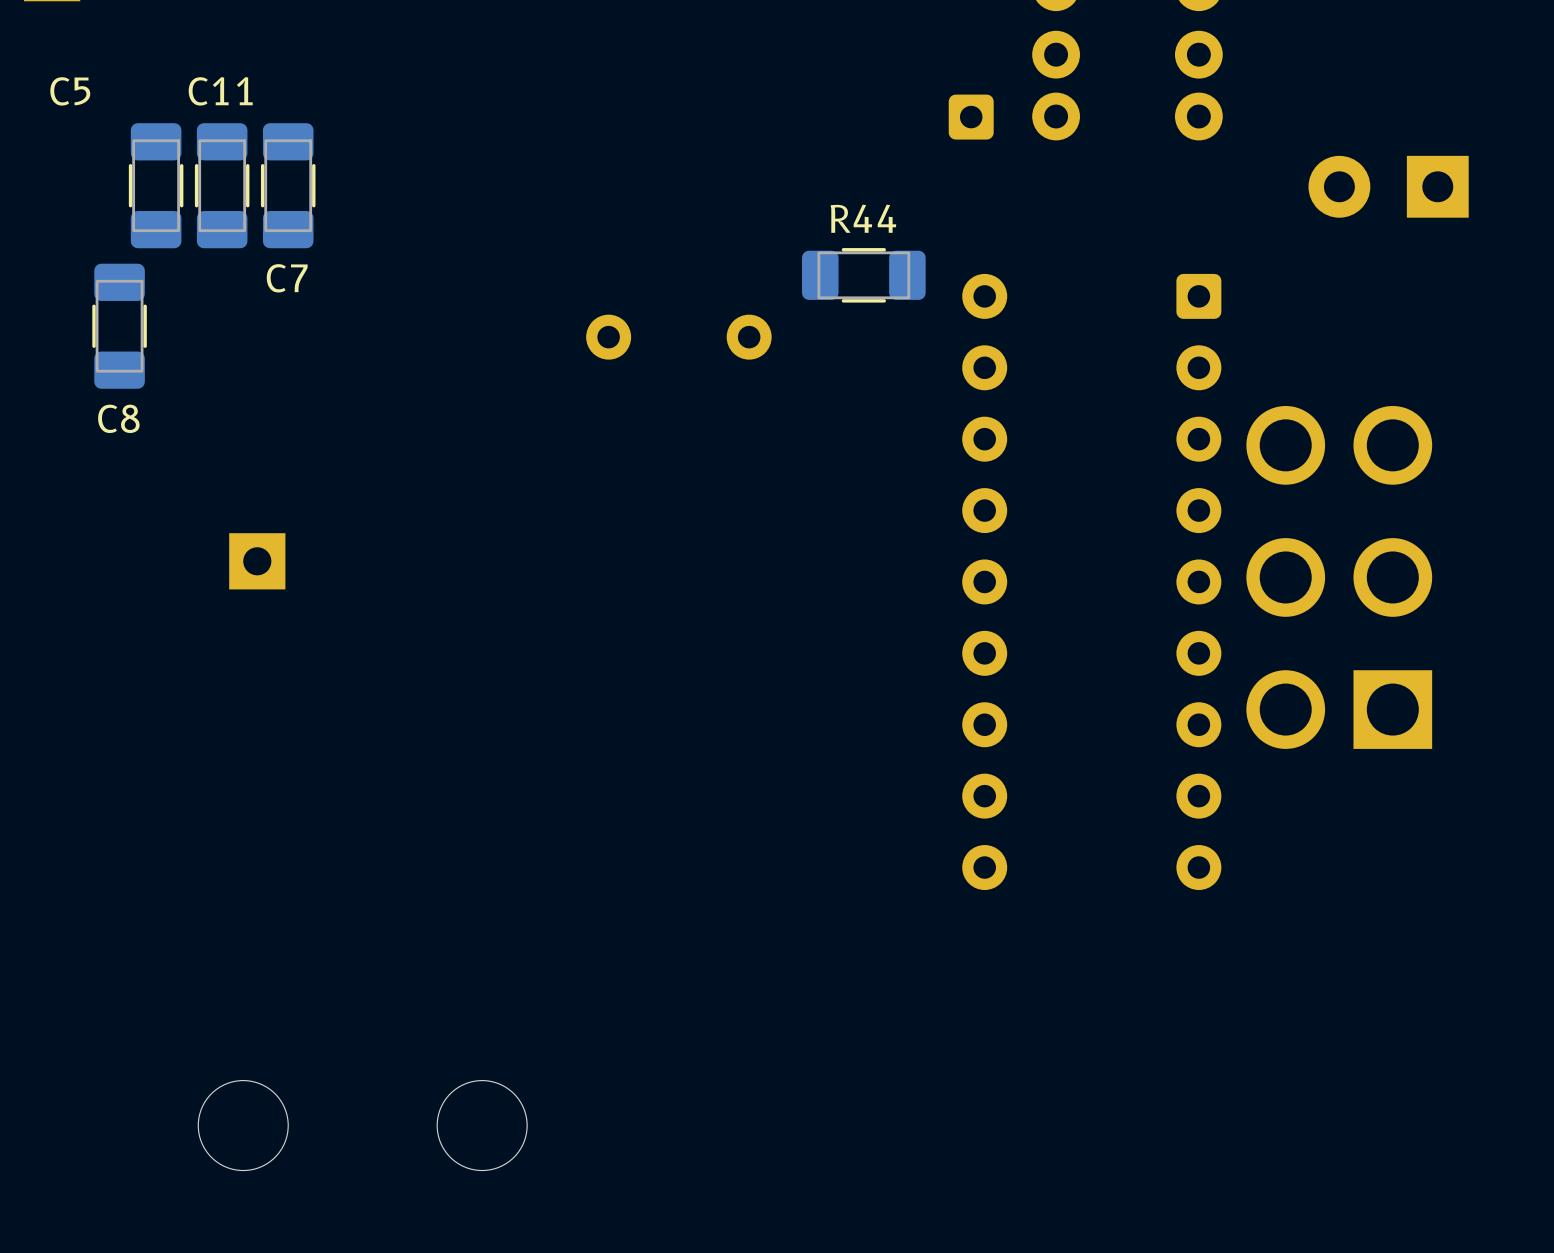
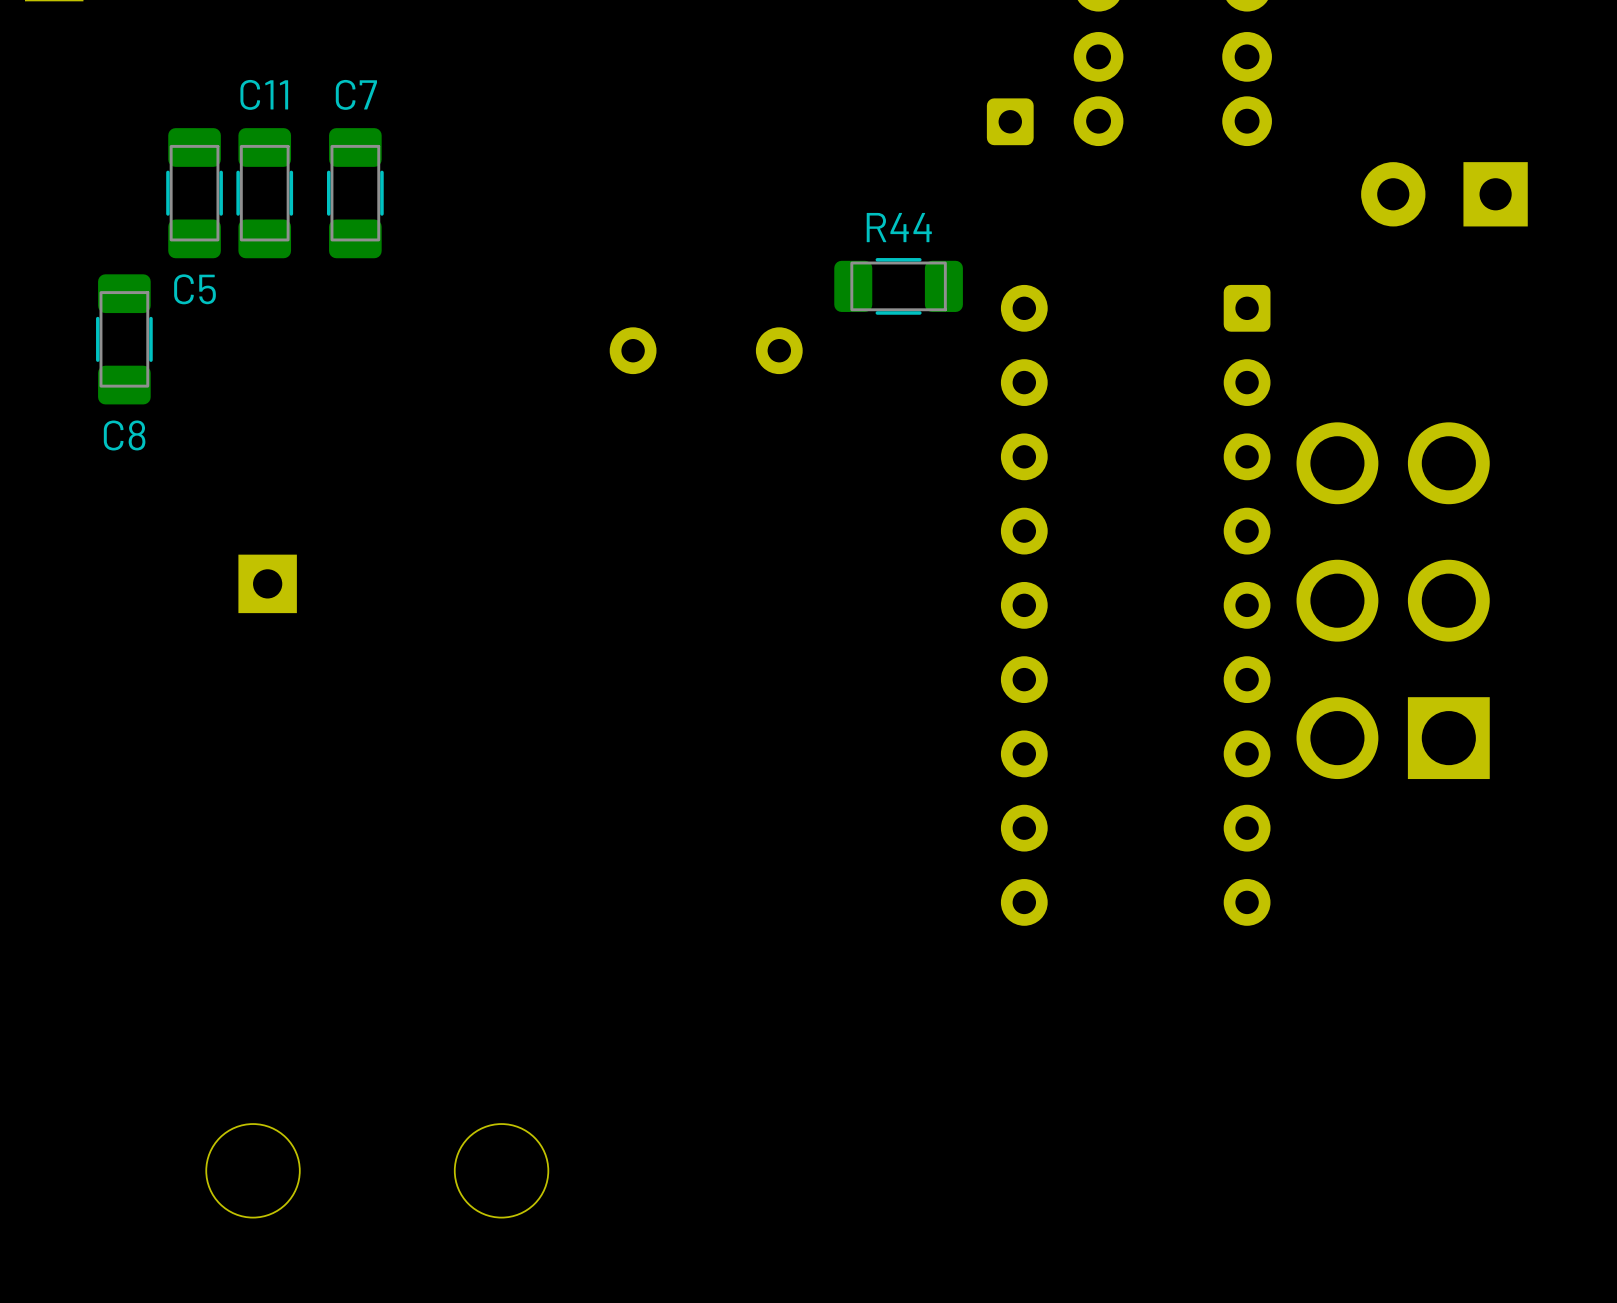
C5 name position: C5 (70, 91) -> C5 (195, 289)
C5 position: (156, 185) -> (194, 193)
C11 position: (222, 185) -> (264, 193)
C7 position: (288, 185) -> (355, 193)
C7 name position: C7 (287, 278) -> C7 (356, 94)

